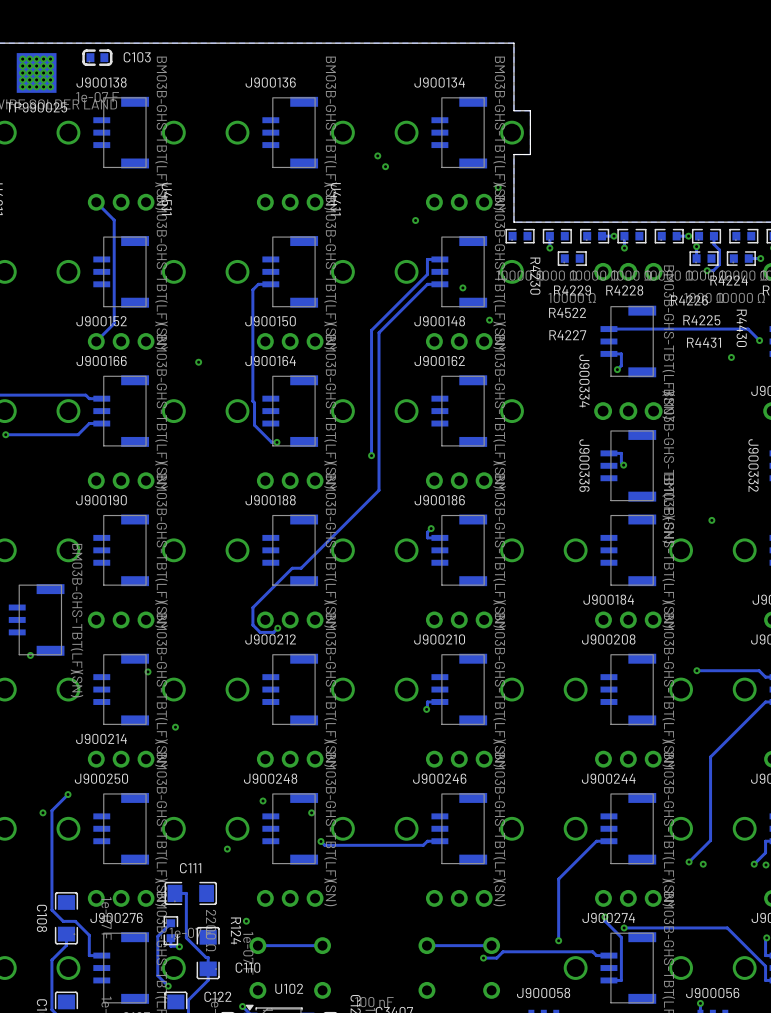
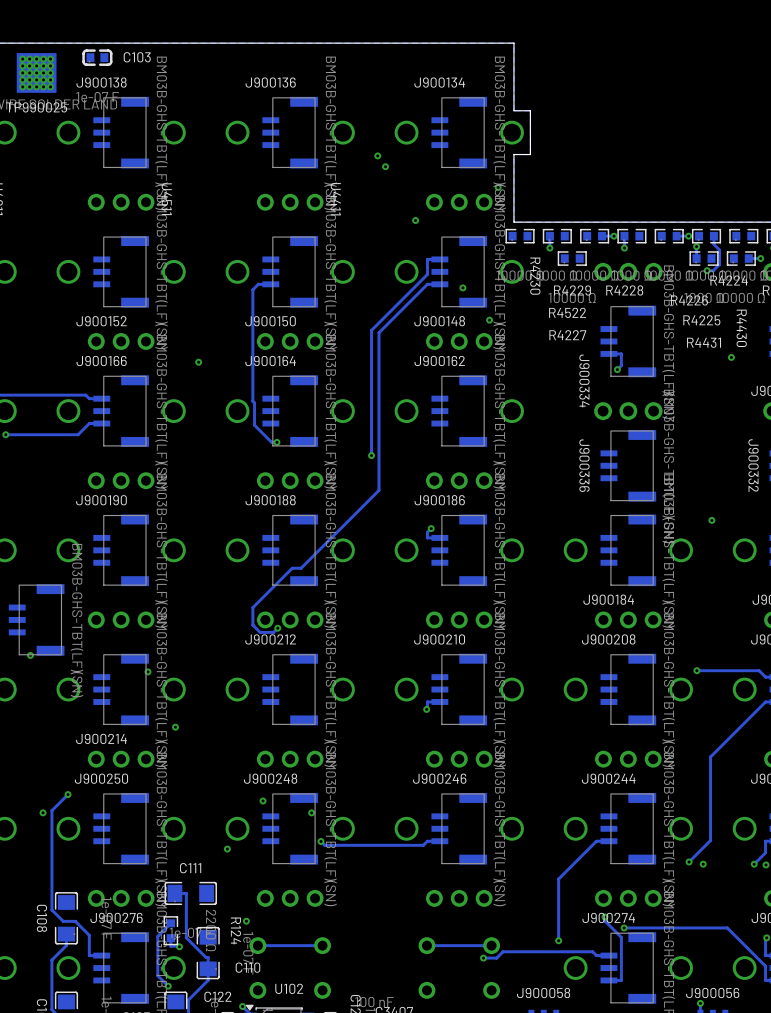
track: (96, 202) (114, 220) (114, 323) (96, 341) -> none
track: (608, 329) (748, 329) (759, 340) -> none
via: (759, 340) -> none
track: (608, 453) (621, 453) (621, 462) (623, 465) -> none
via: (623, 465) -> none

